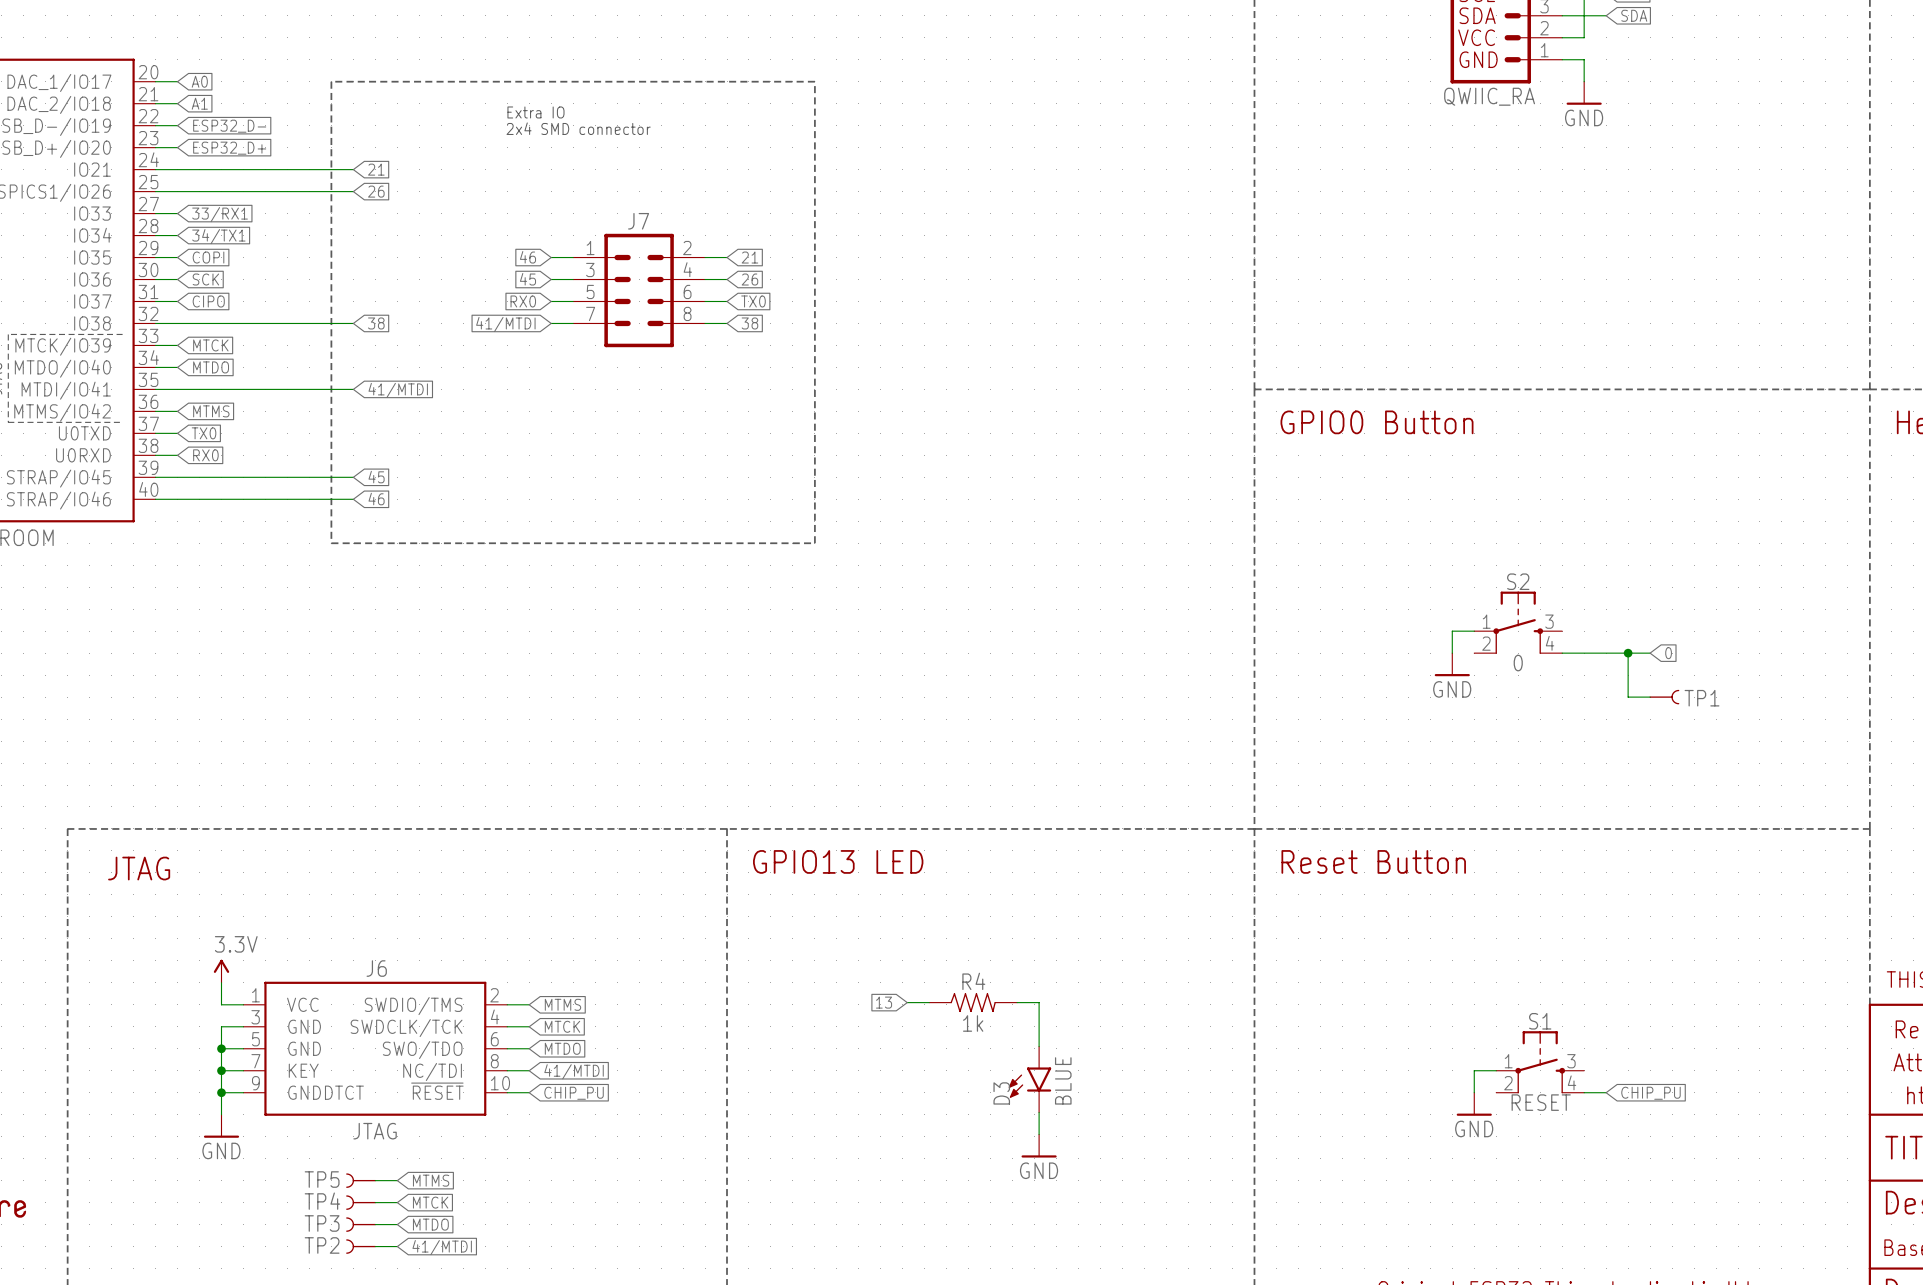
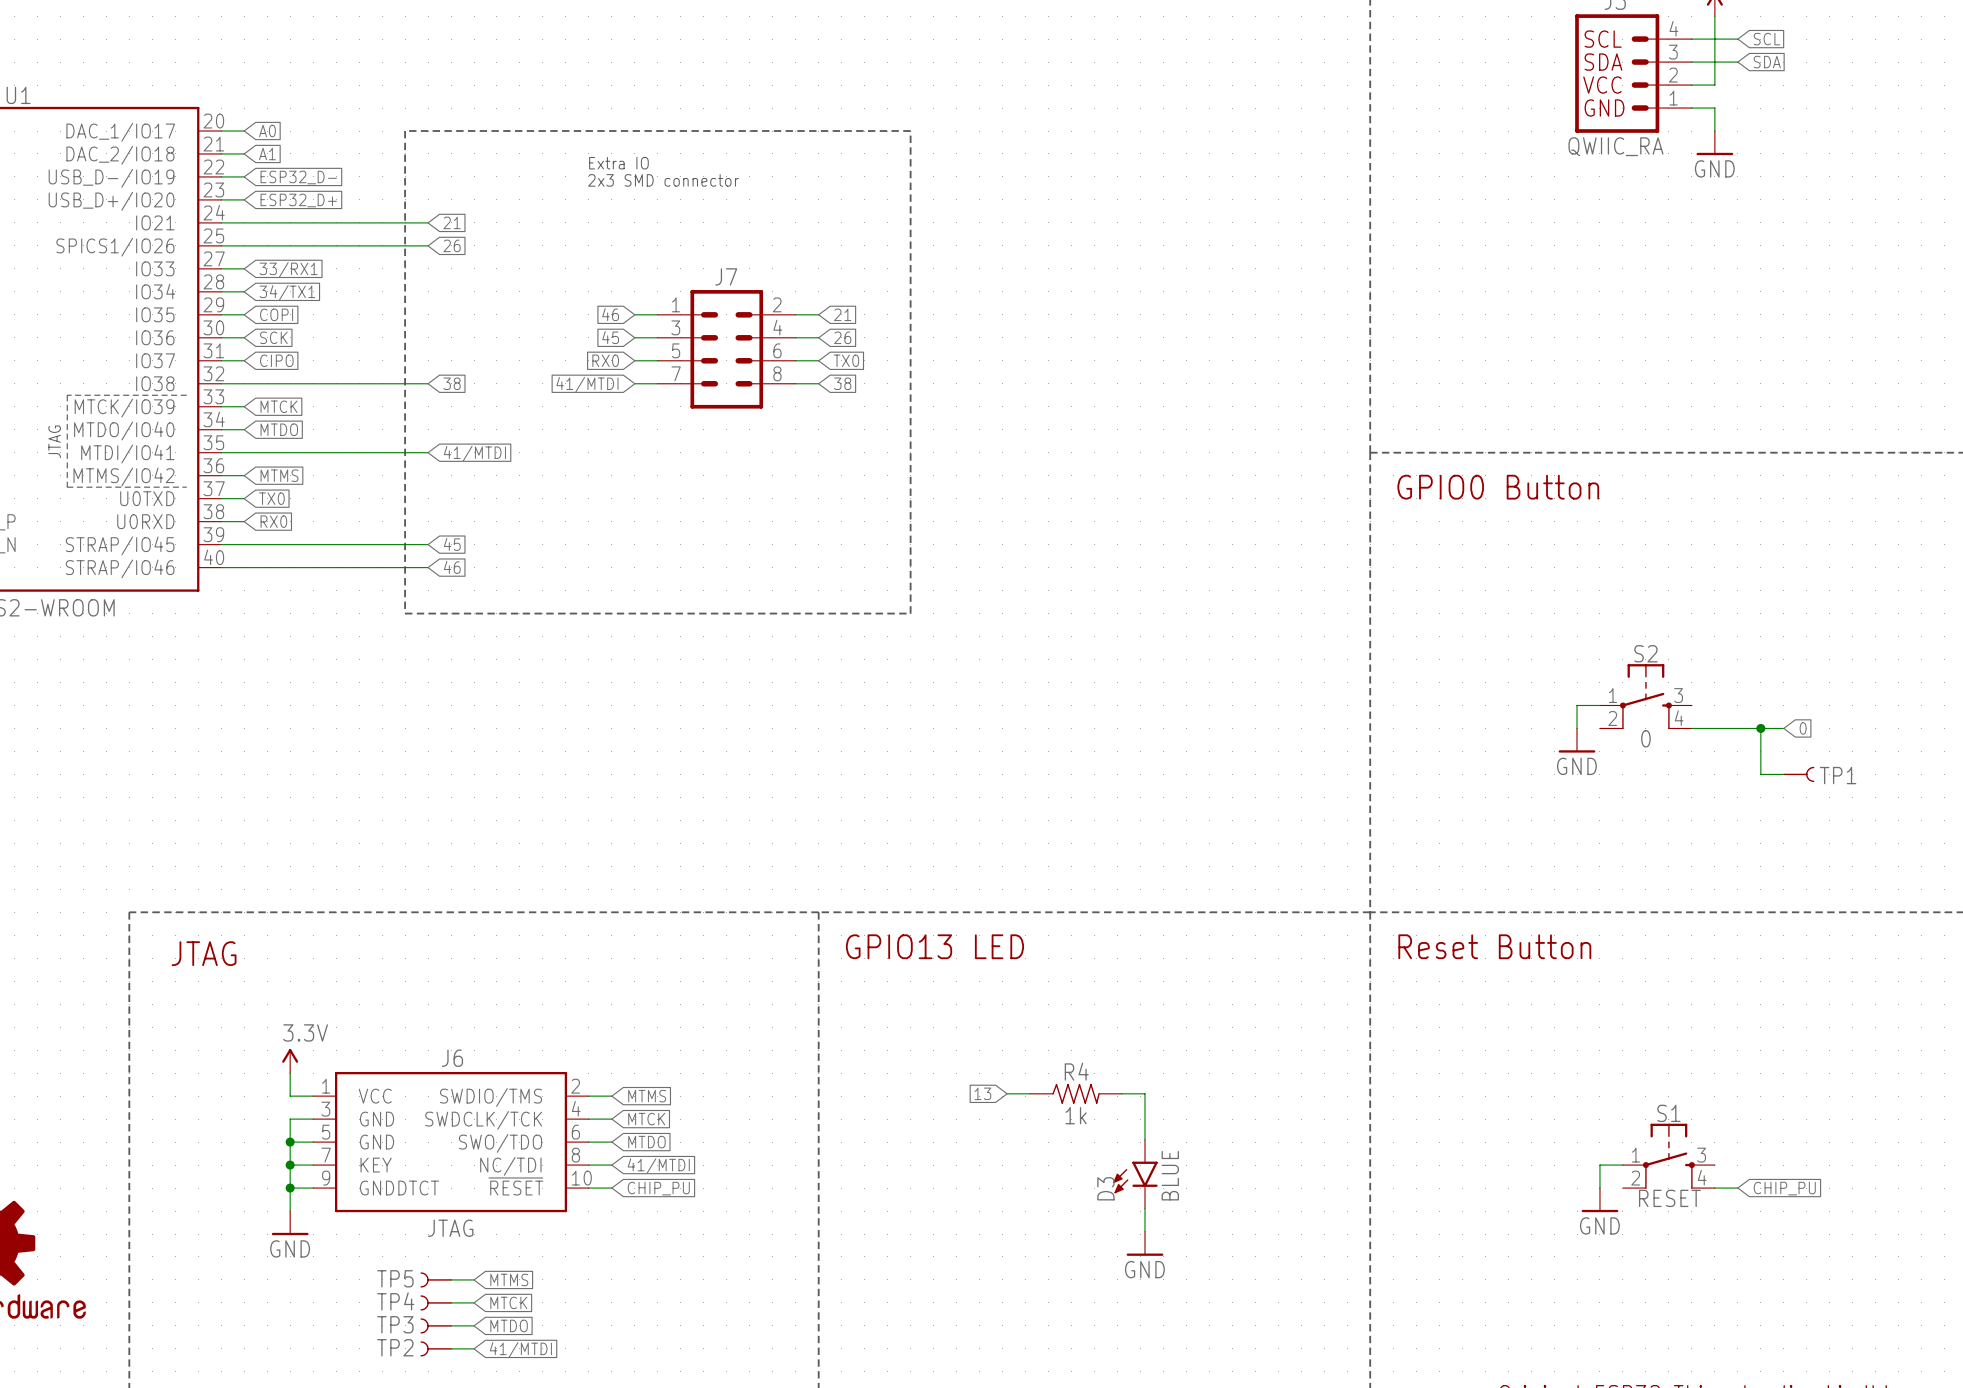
text: 2x4 SMD connector (578, 128) -> 2x3 SMD connector (663, 180)

